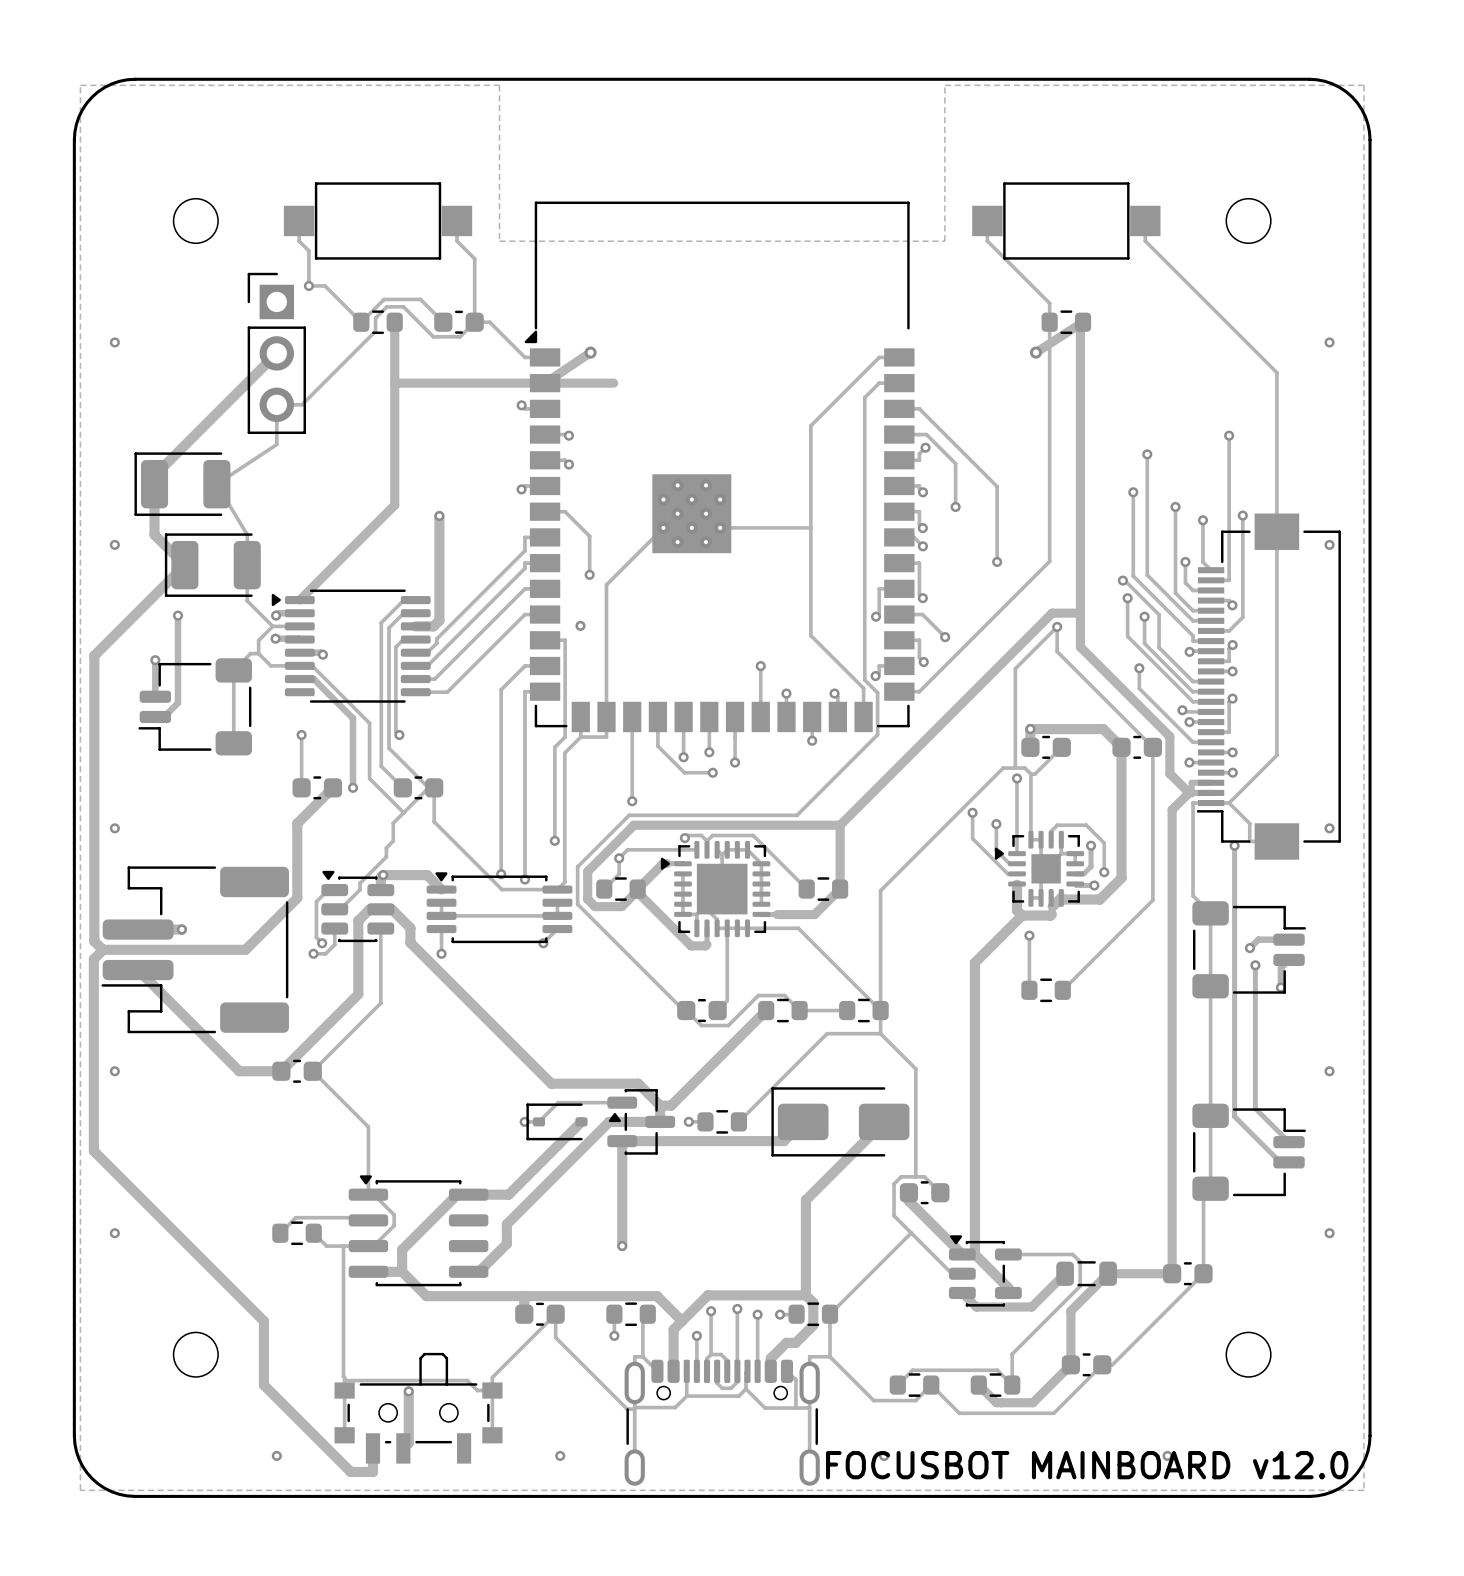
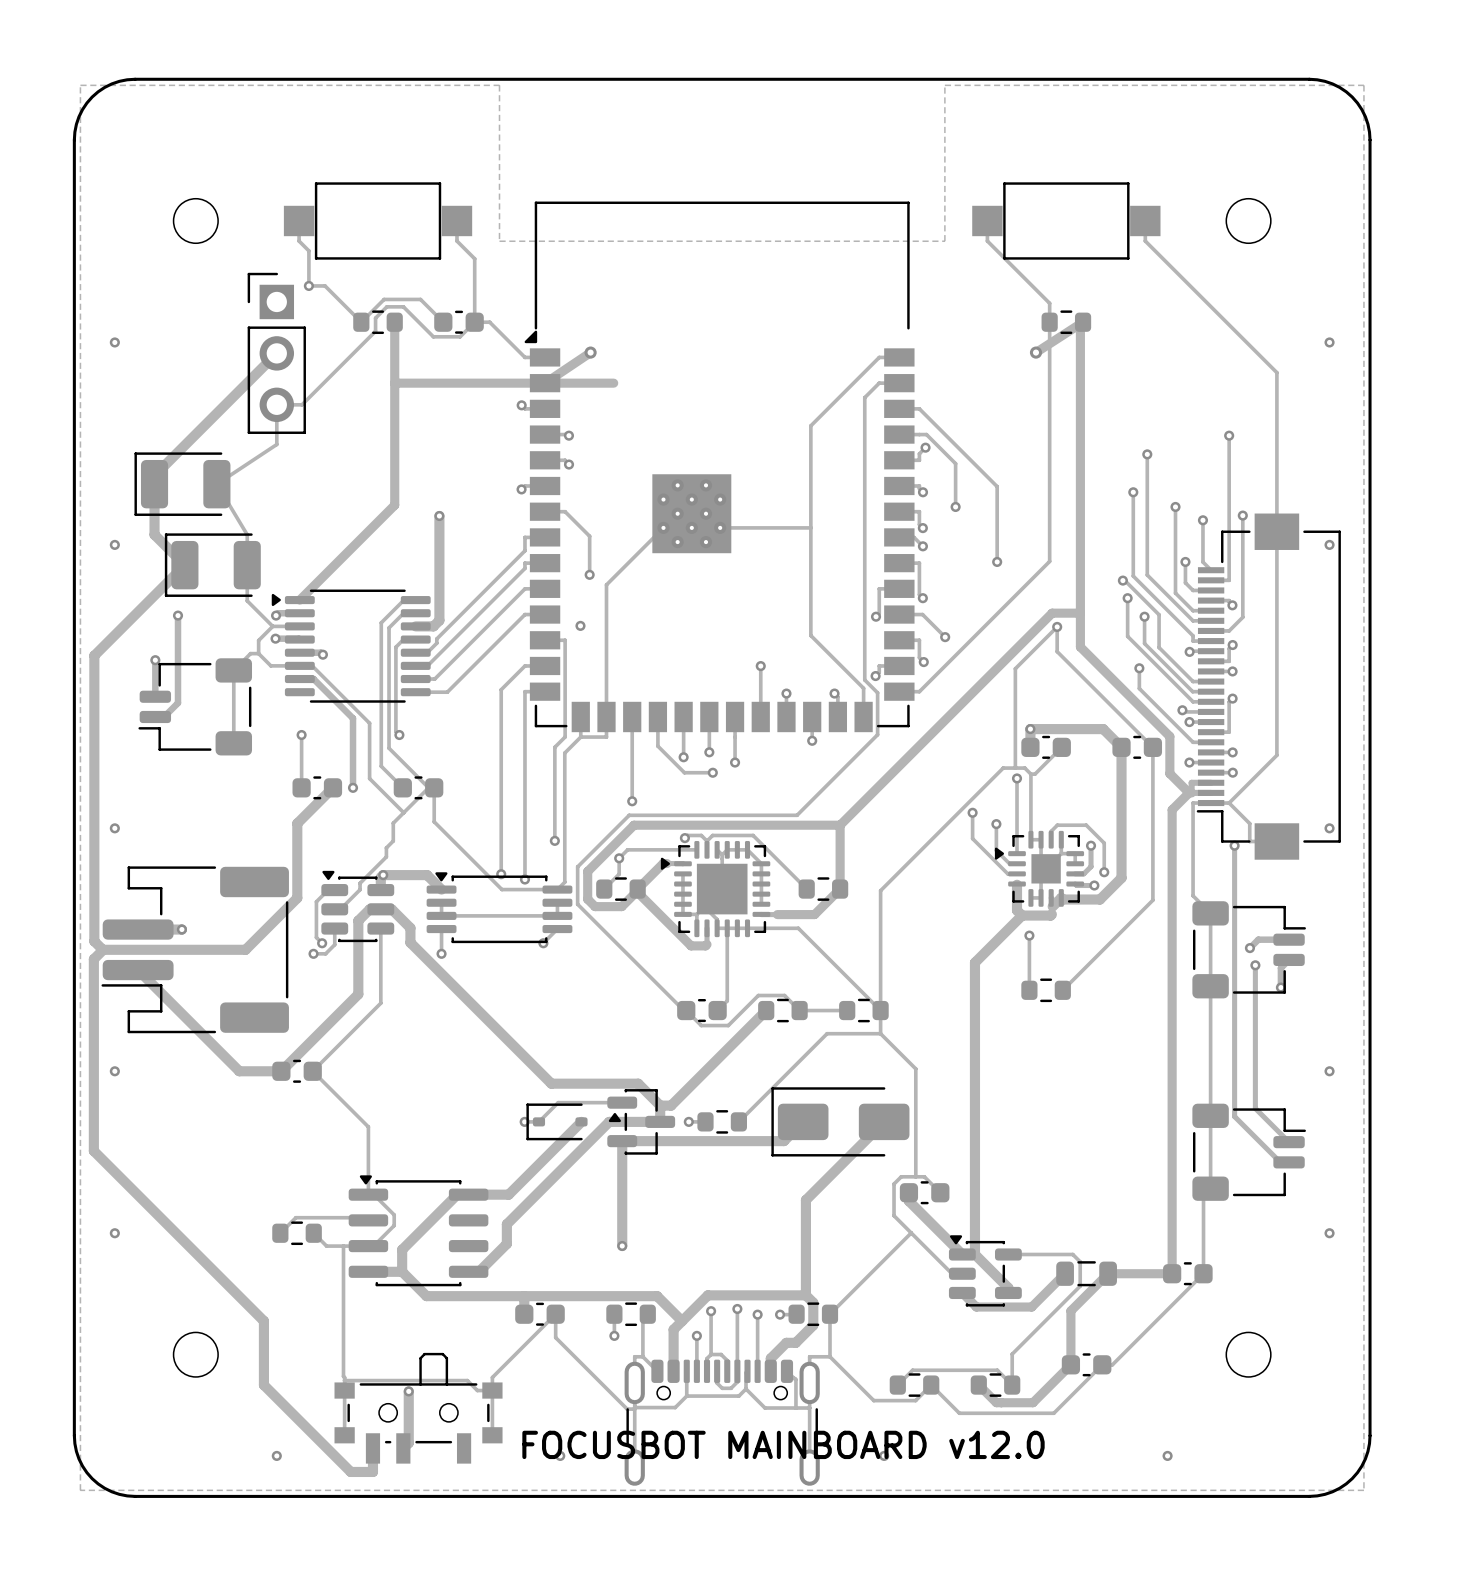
text position: FOCUSBOT MAINBOARD v12.0 (1087, 1465) -> FOCUSBOT MAINBOARD v12.0 (783, 1444)

